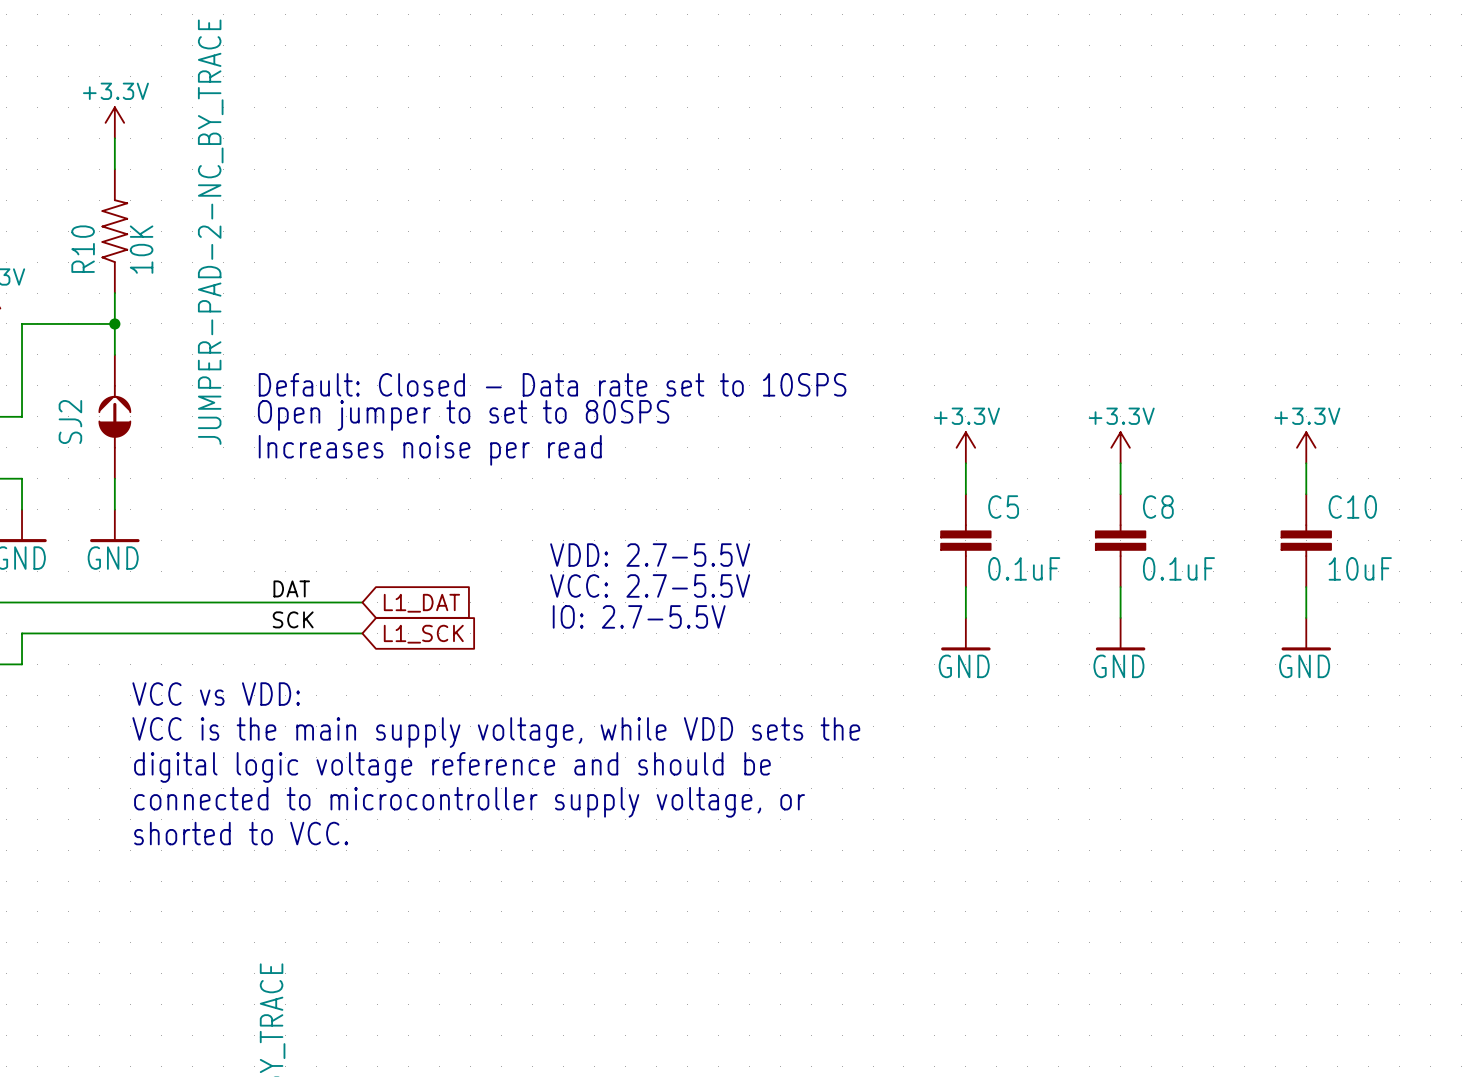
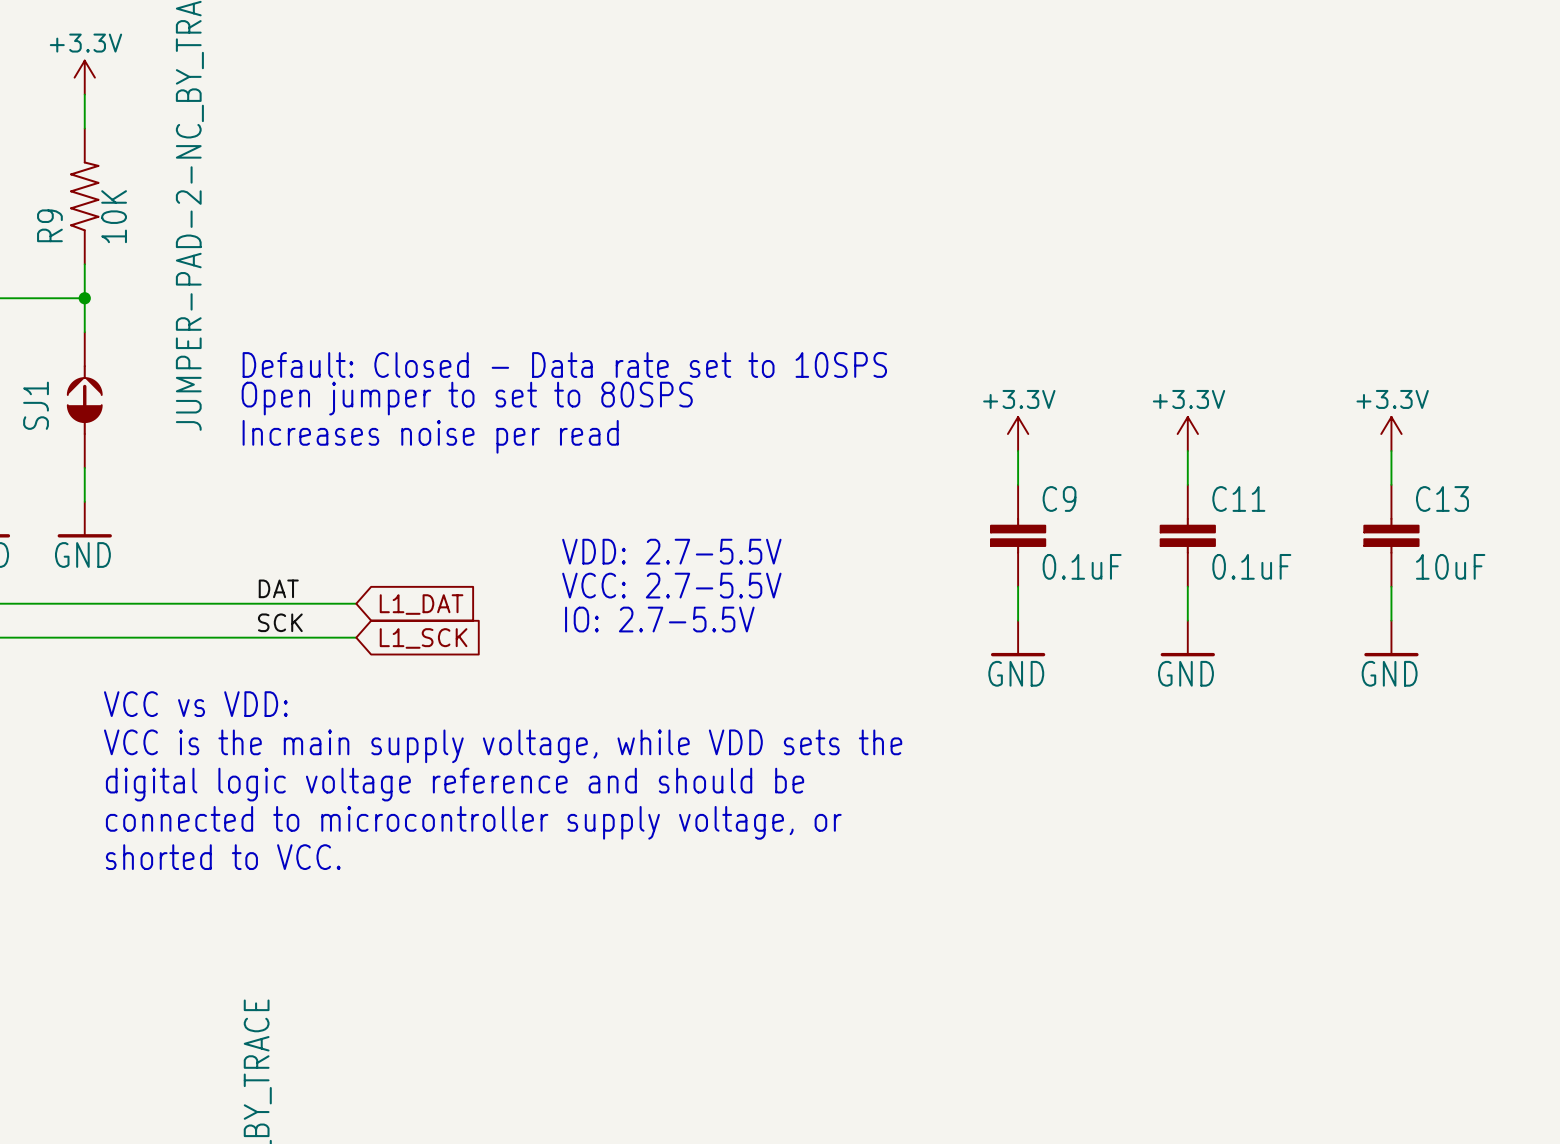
R10 name: R10 (83, 249) -> R9 (49, 225)
SJ2 name: SJ2 (70, 422) -> SJ1 (36, 405)
C5 name: C5 (1003, 507) -> C9 (1059, 498)
C8 name: C8 (1158, 507) -> C11 (1238, 498)
C10 name: C10 (1352, 507) -> C13 (1442, 498)

